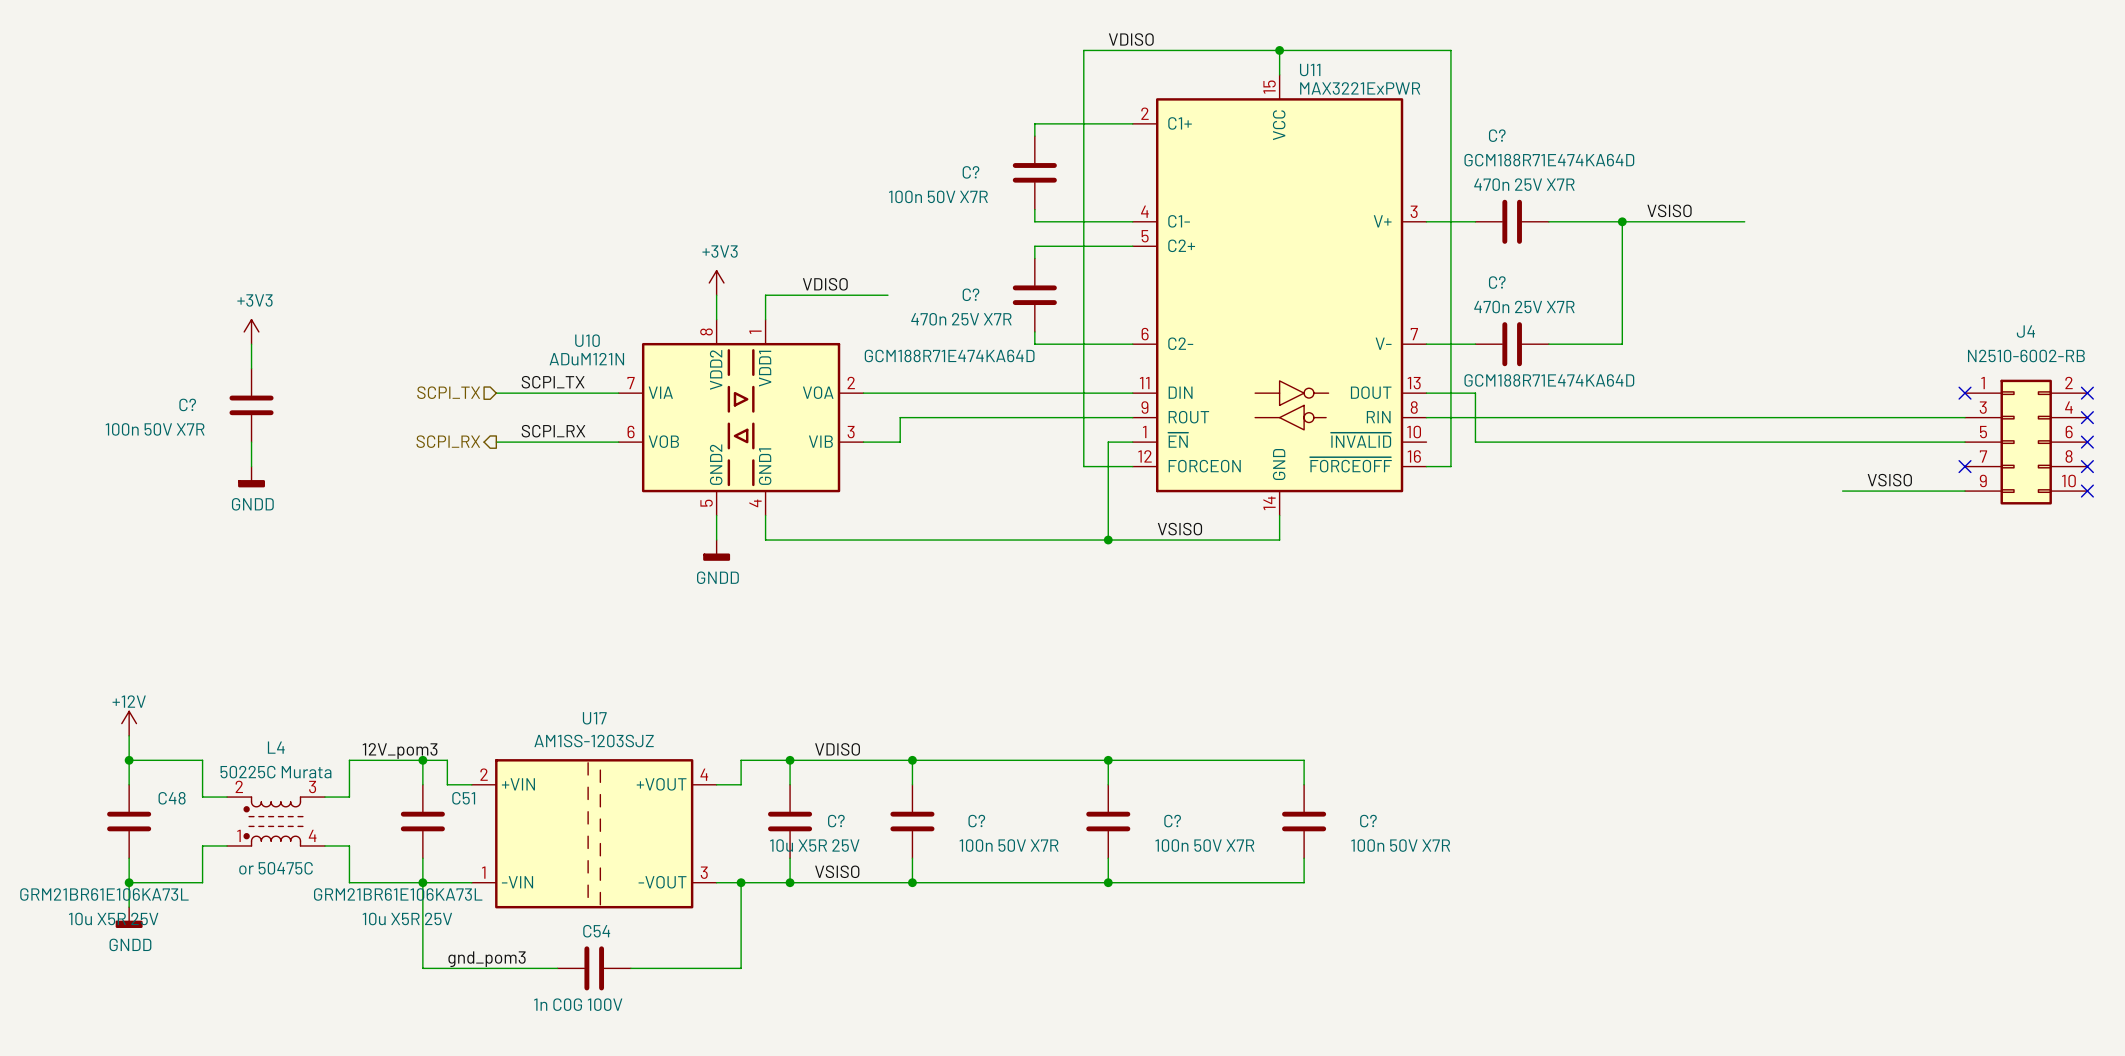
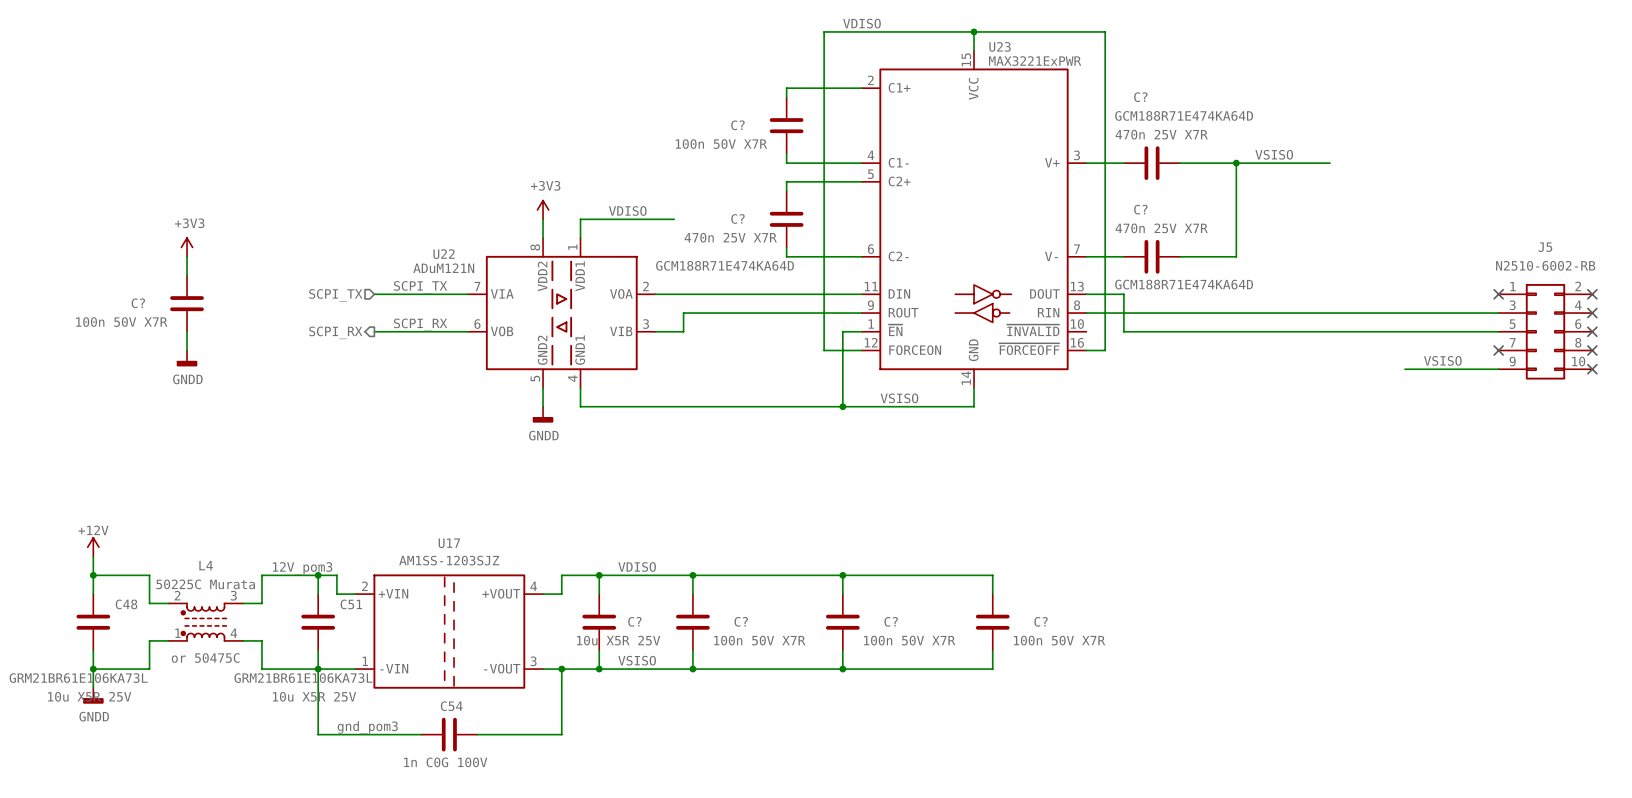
U11 name: U11 (1310, 70) -> U23 (1000, 46)
J4 name: J4 (2025, 331) -> J5 (1545, 247)
U10 name: U10 (587, 340) -> U22 (444, 254)

